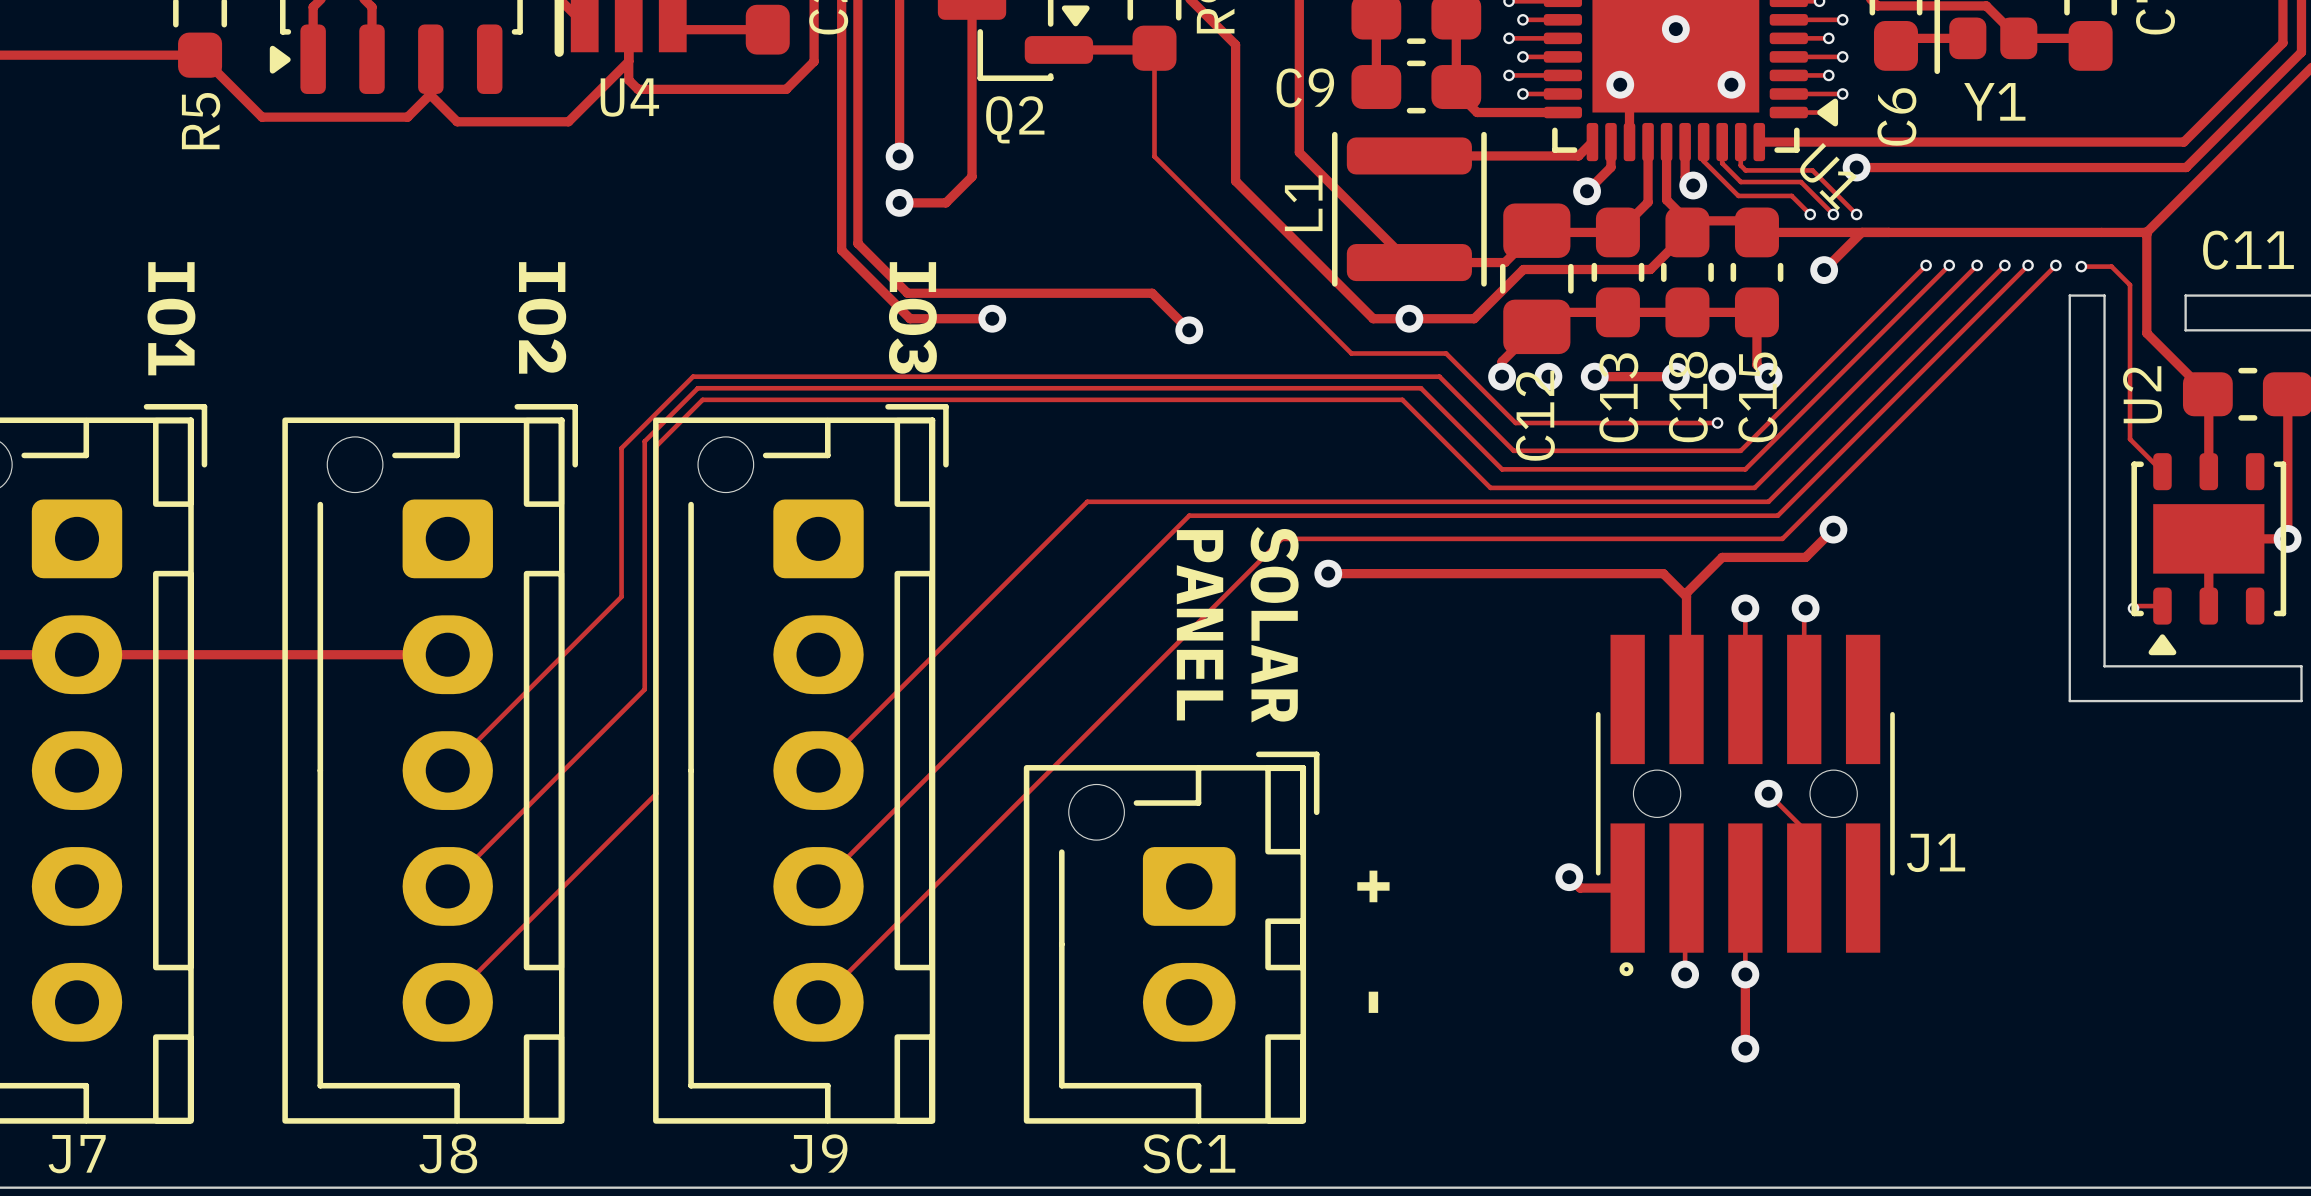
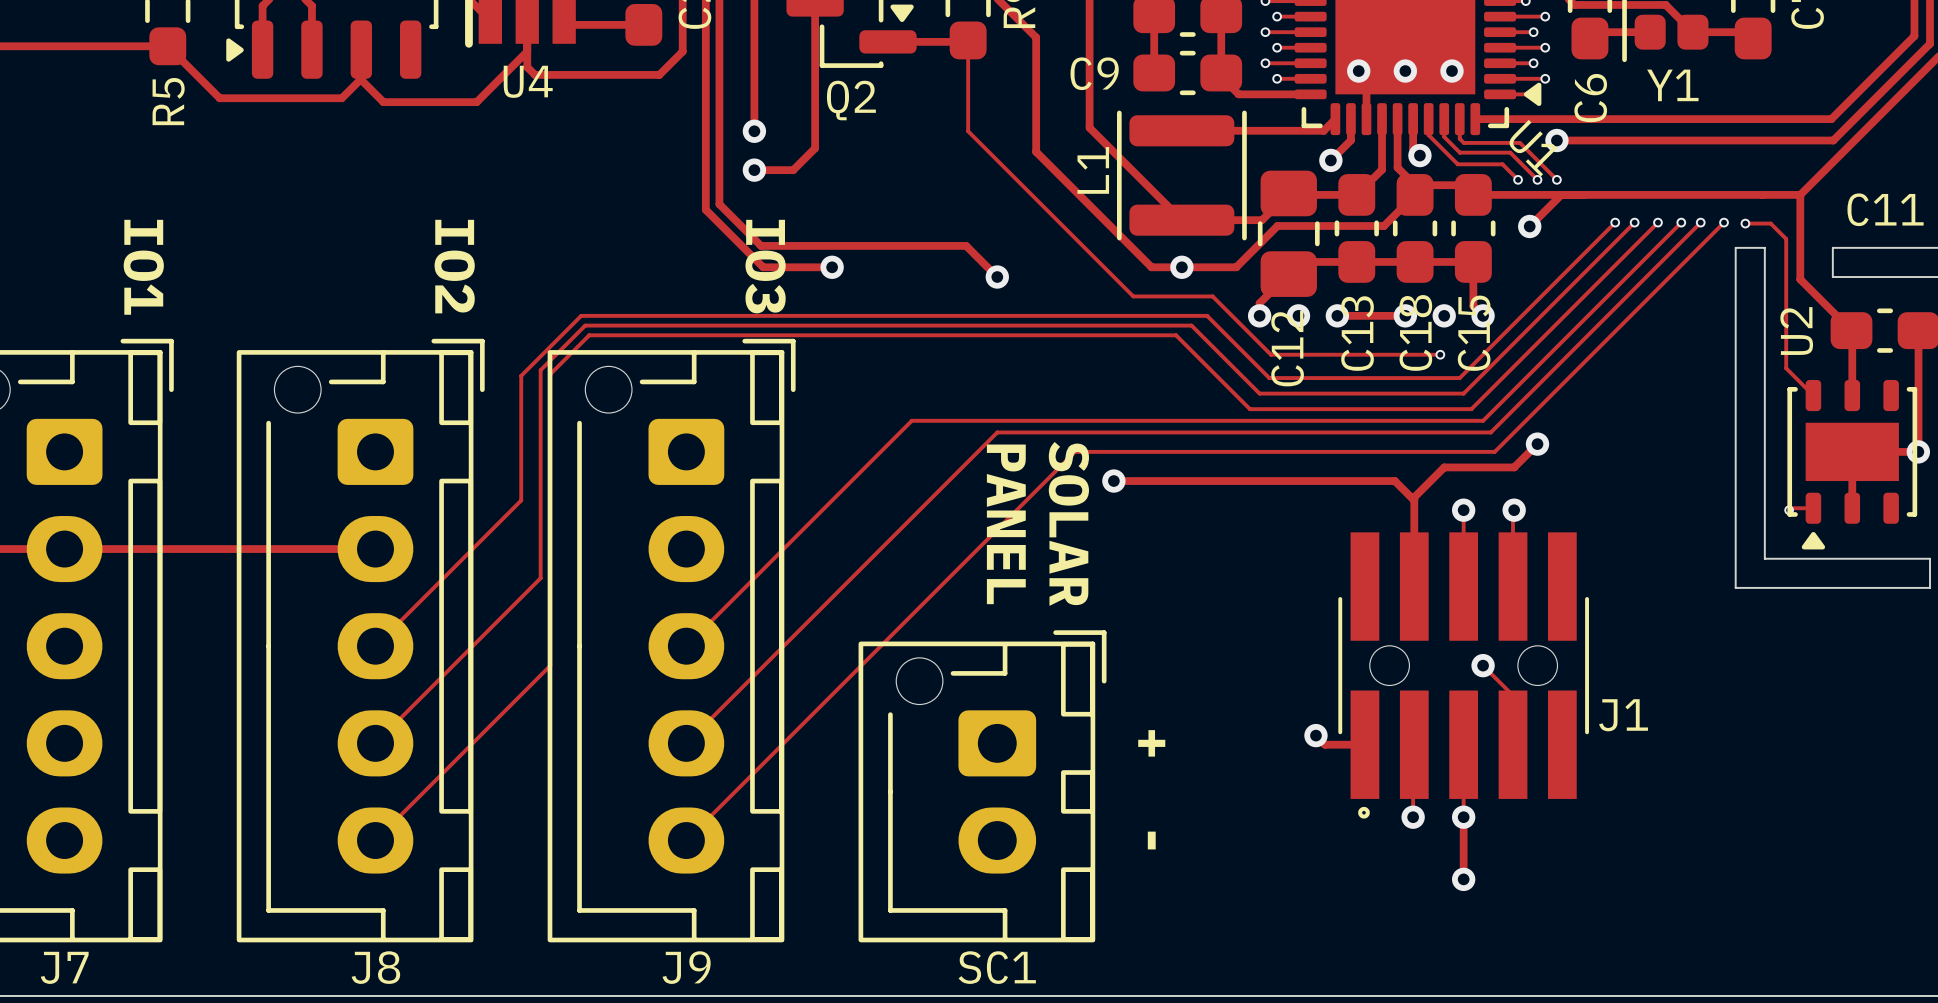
via: (1675, 29) -> none
via: none -> (1405, 71)

